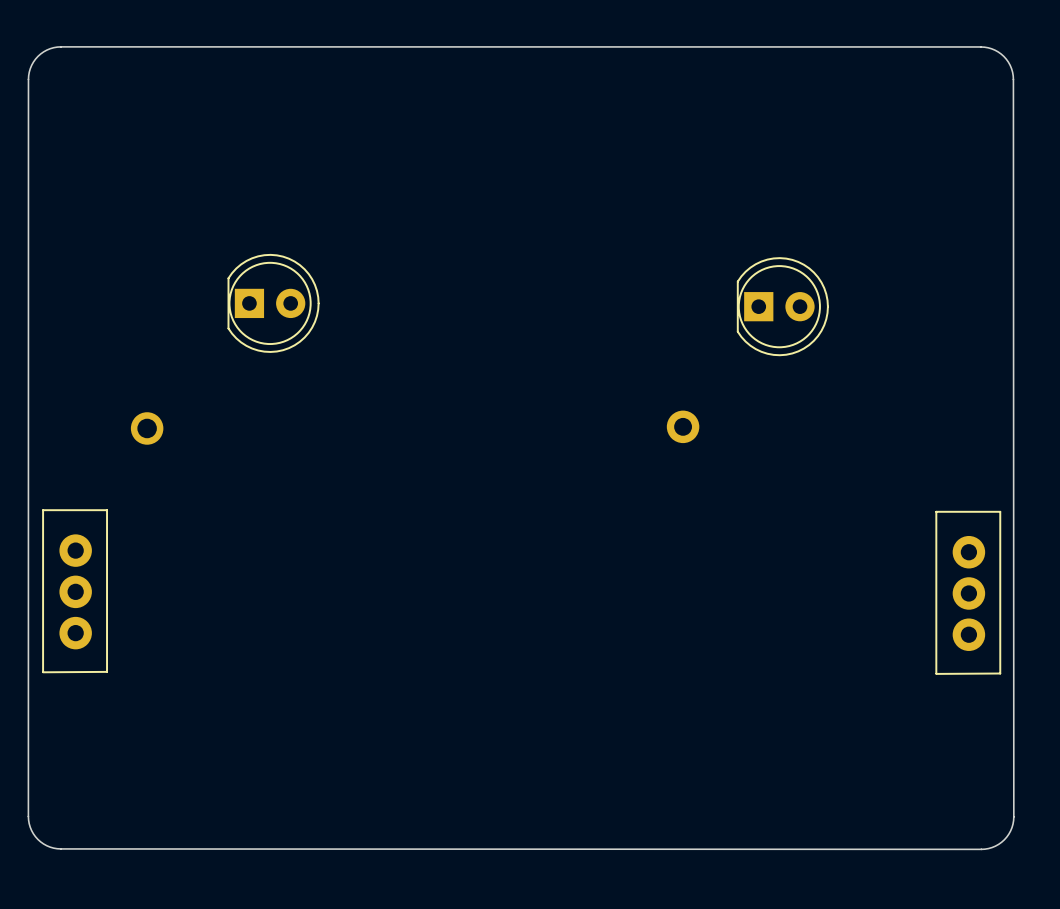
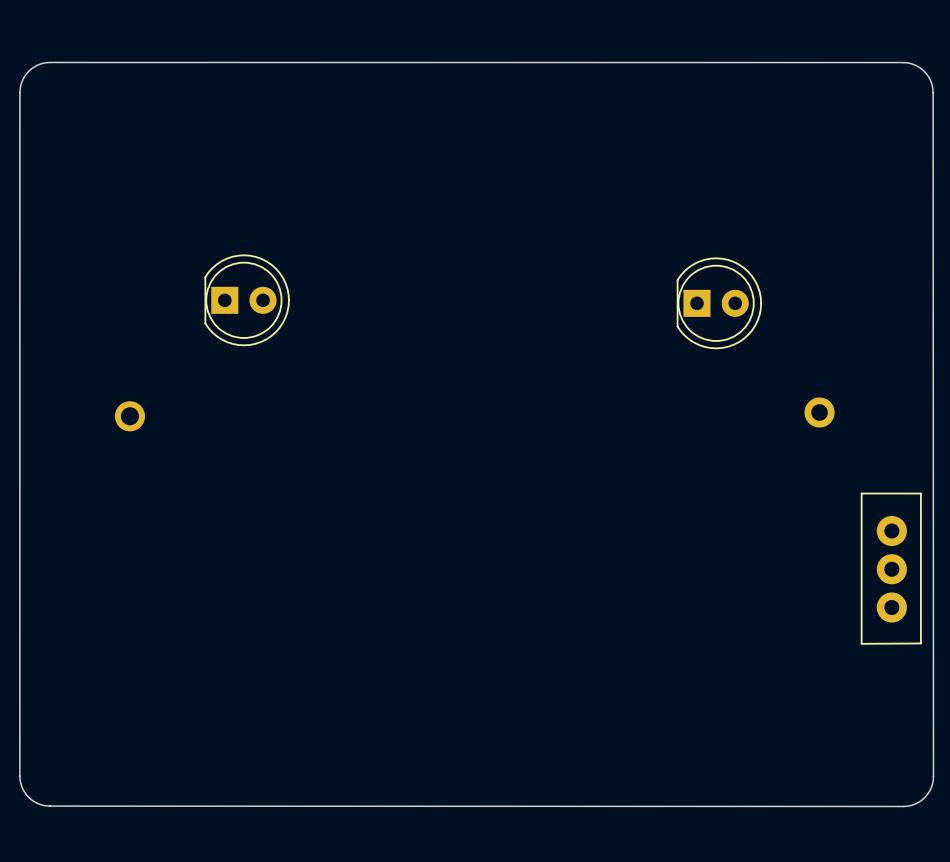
part position: (683, 426) -> (819, 412)
part: (75, 591) -> none

